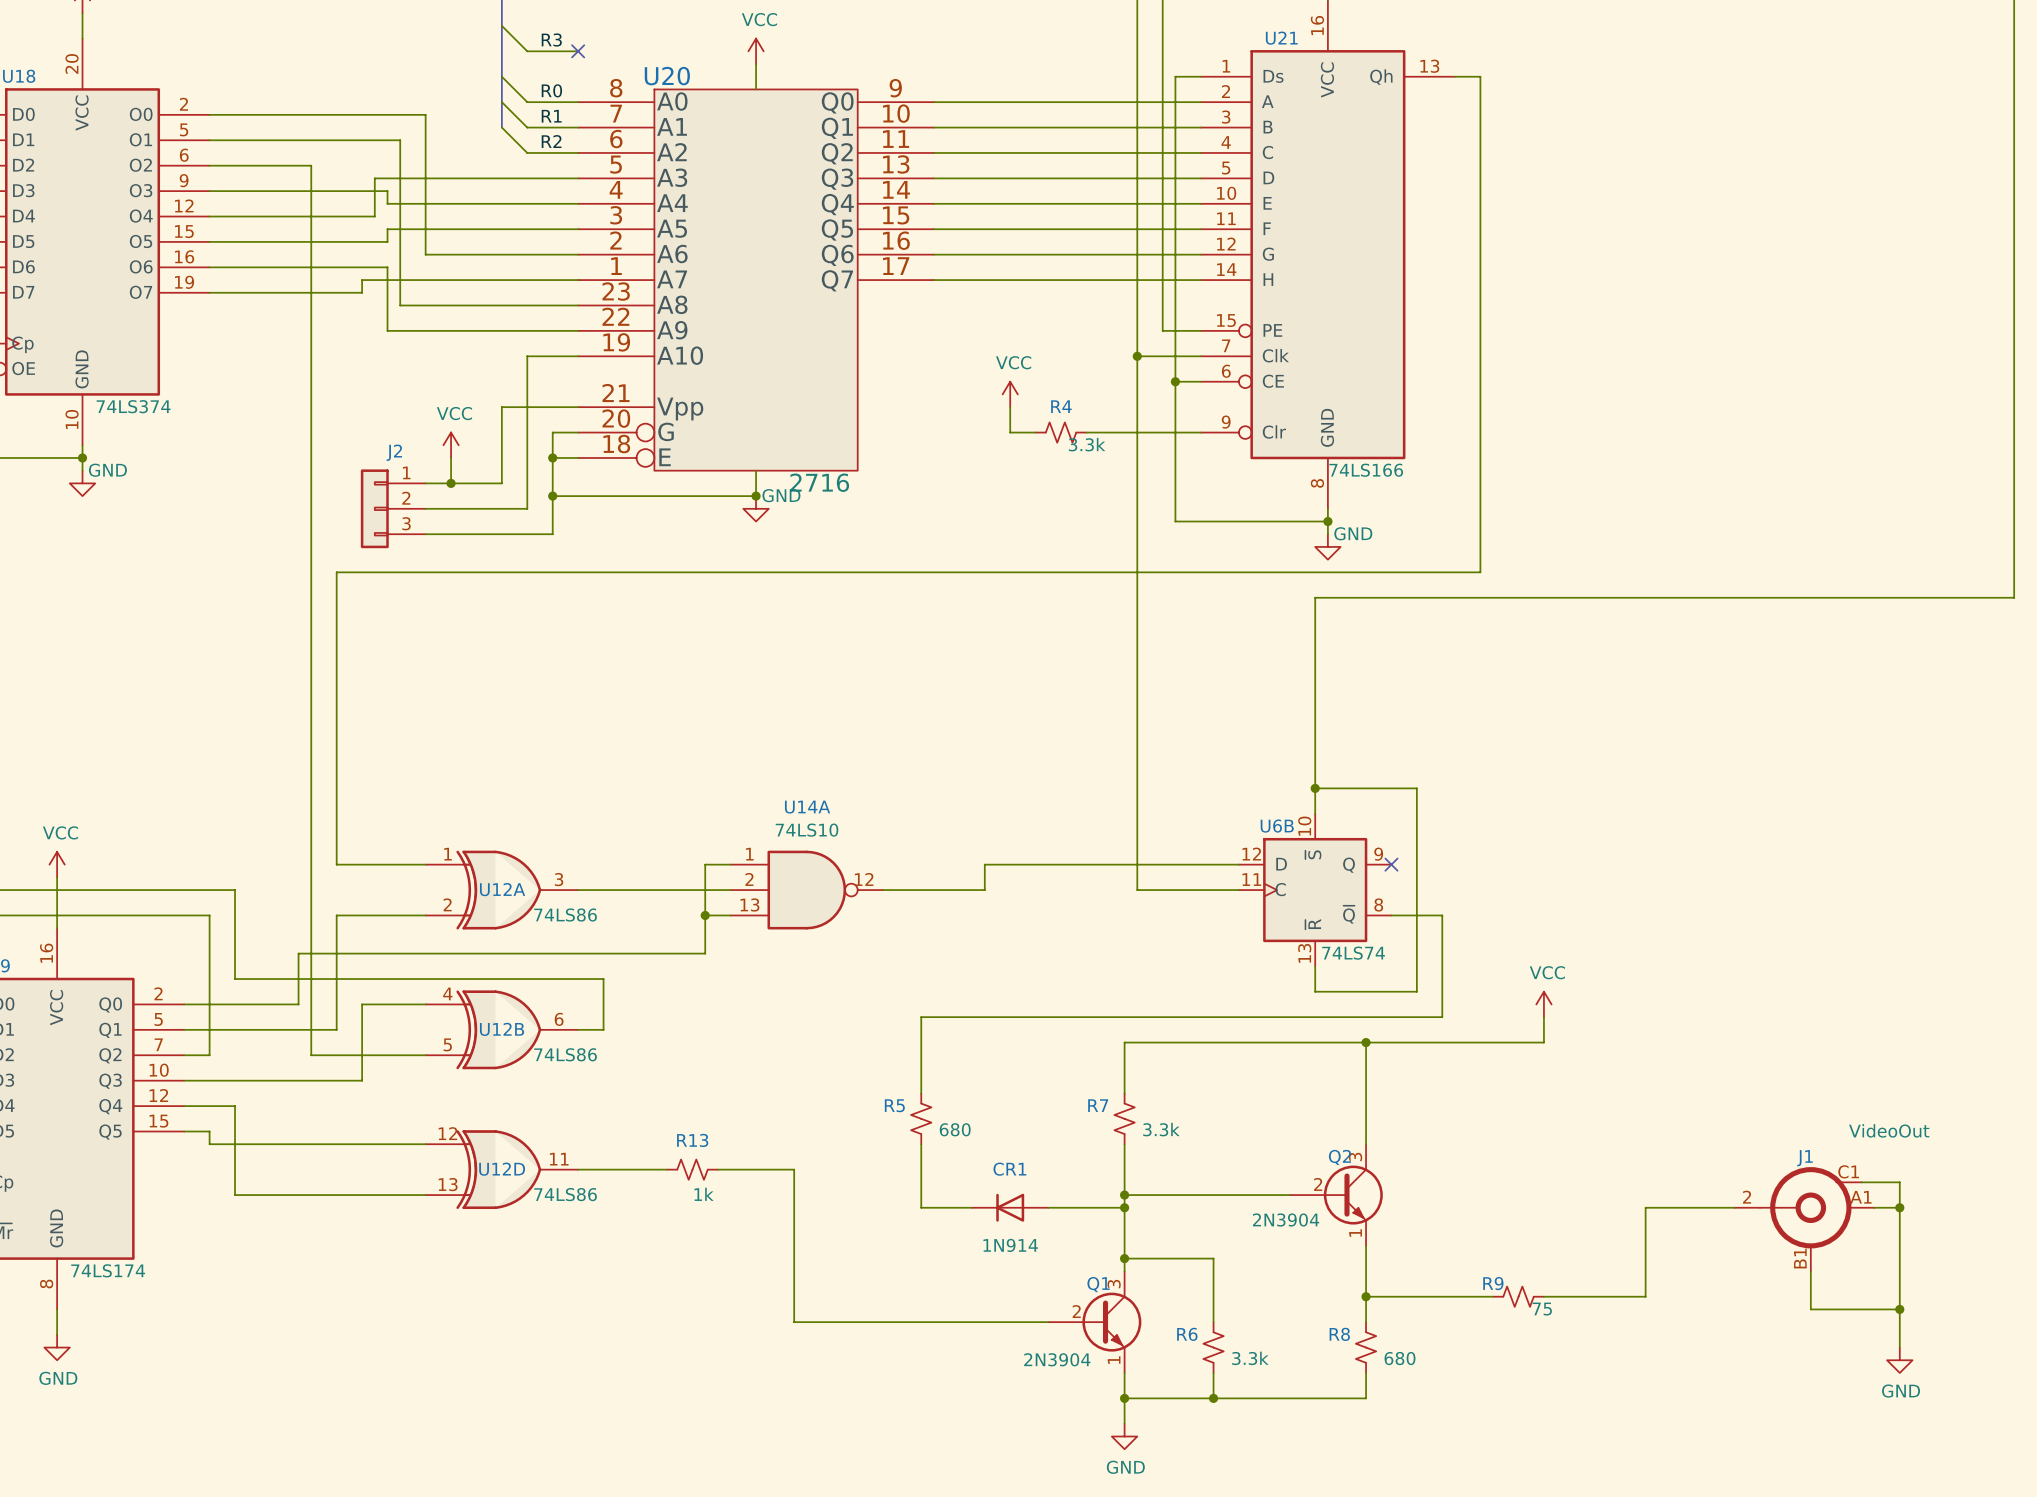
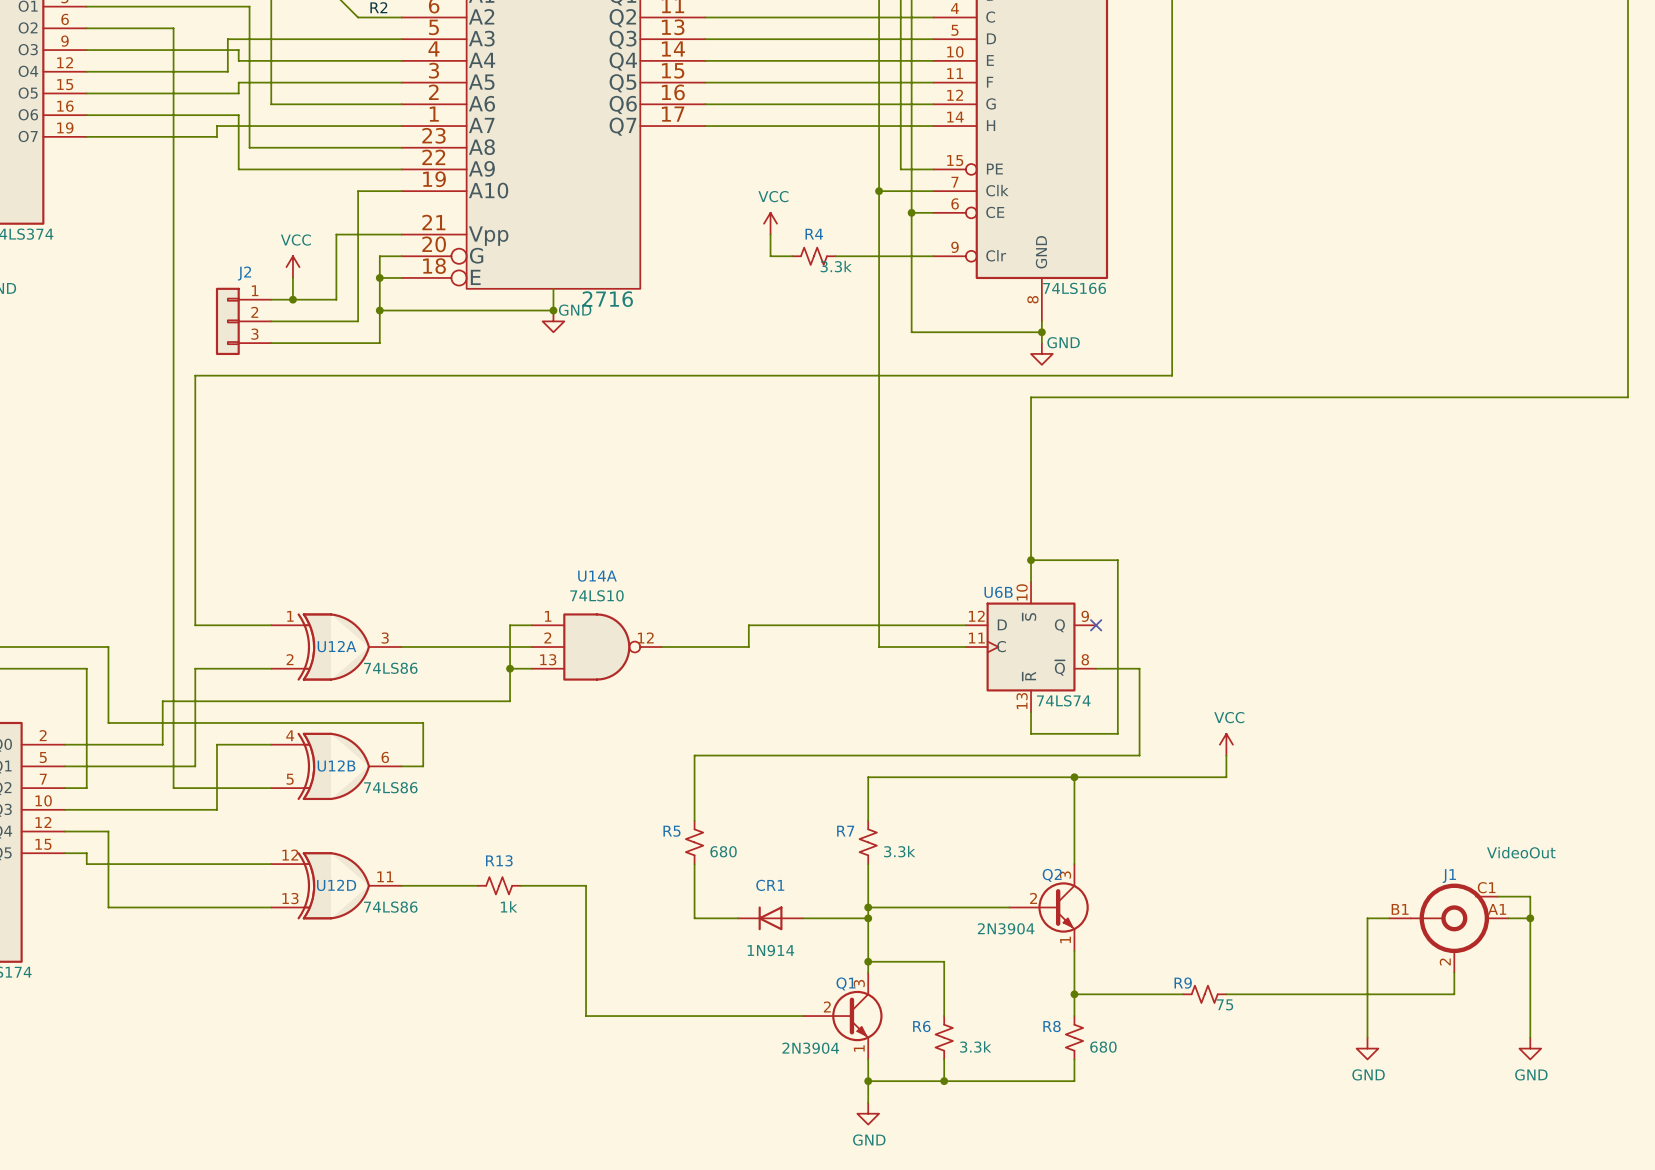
J1 pin number: 2 (1747, 1197) -> B1 (1400, 909)
wire: (1709, 1207) (1645, 1207) (1645, 1296) -> (1367, 918) (1367, 1037)
J1 pin number: B1 (1800, 1258) -> 2 (1445, 961)
wire: (1810, 1296) (1810, 1309) (1899, 1309) -> (1454, 994) (1313, 994)
junction: (1899, 1309) -> none
power symbol: none -> GND (1367, 1048)

